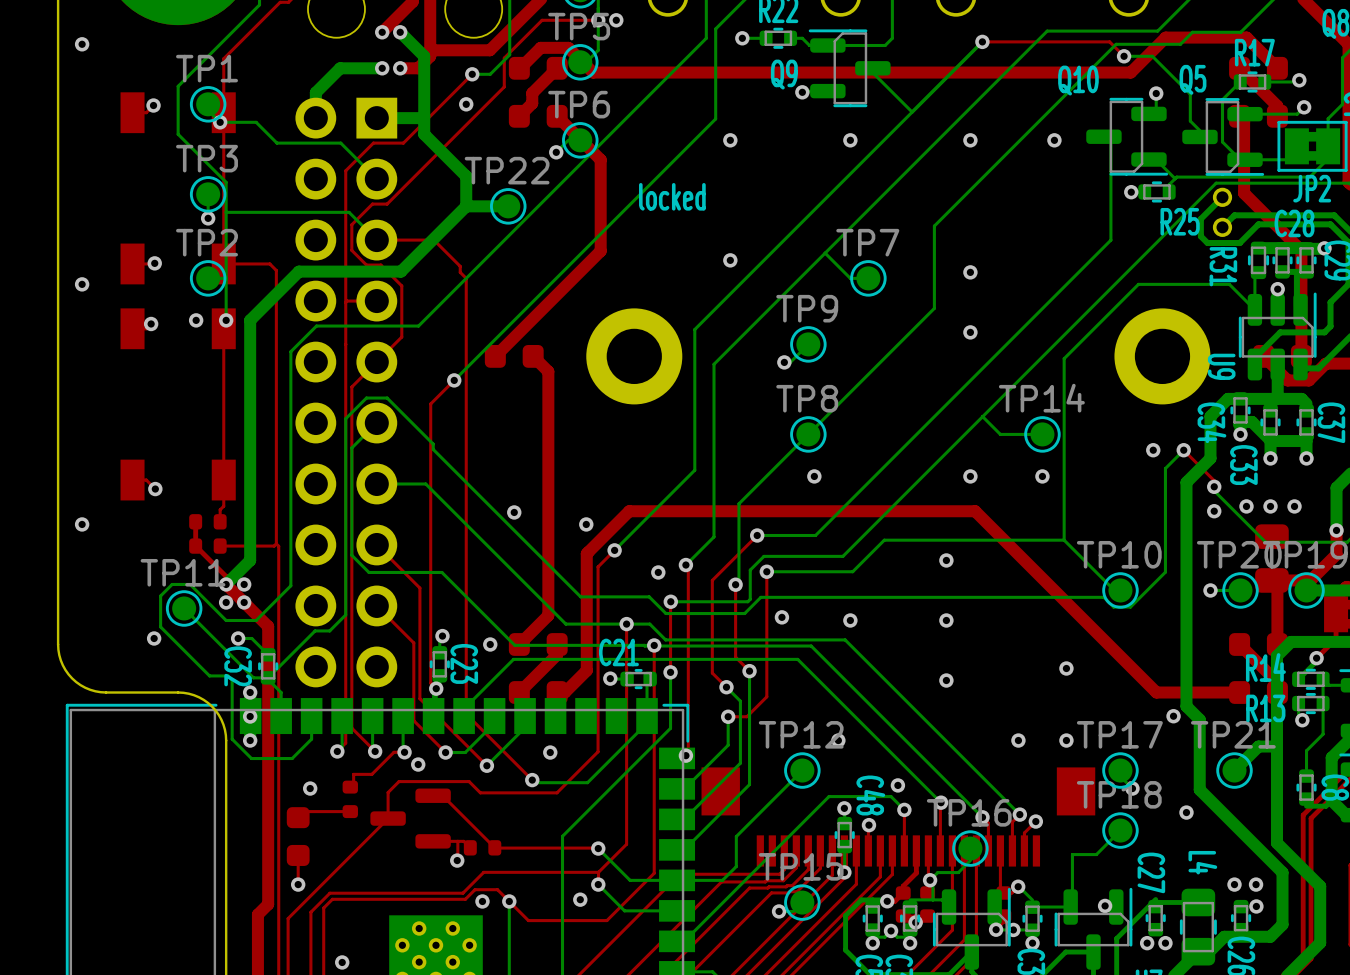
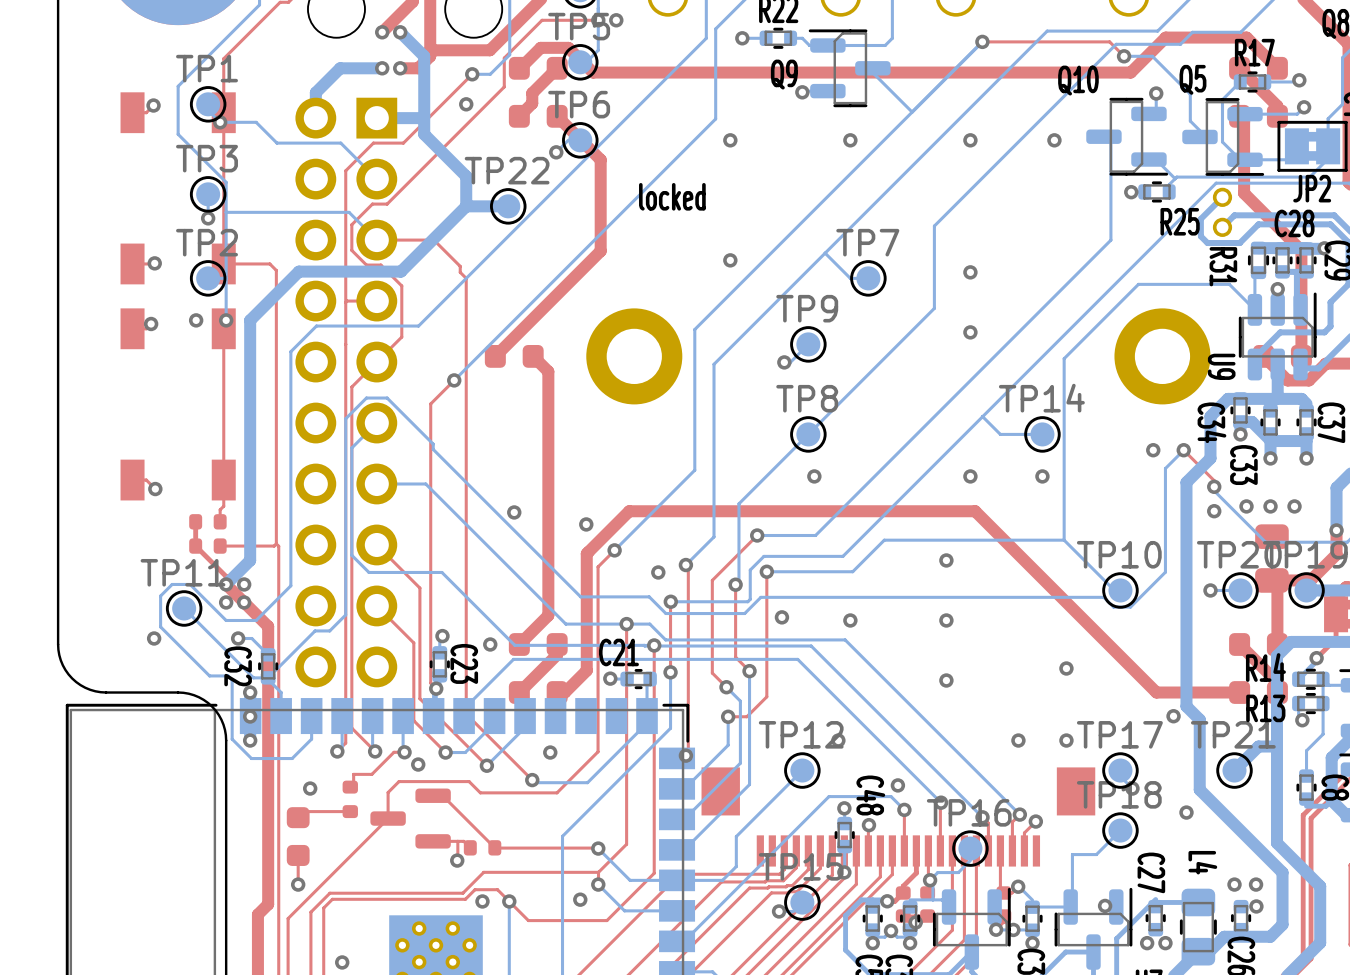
via: (82, 44) -> none
via: (82, 284) -> none
via: (82, 524) -> none

